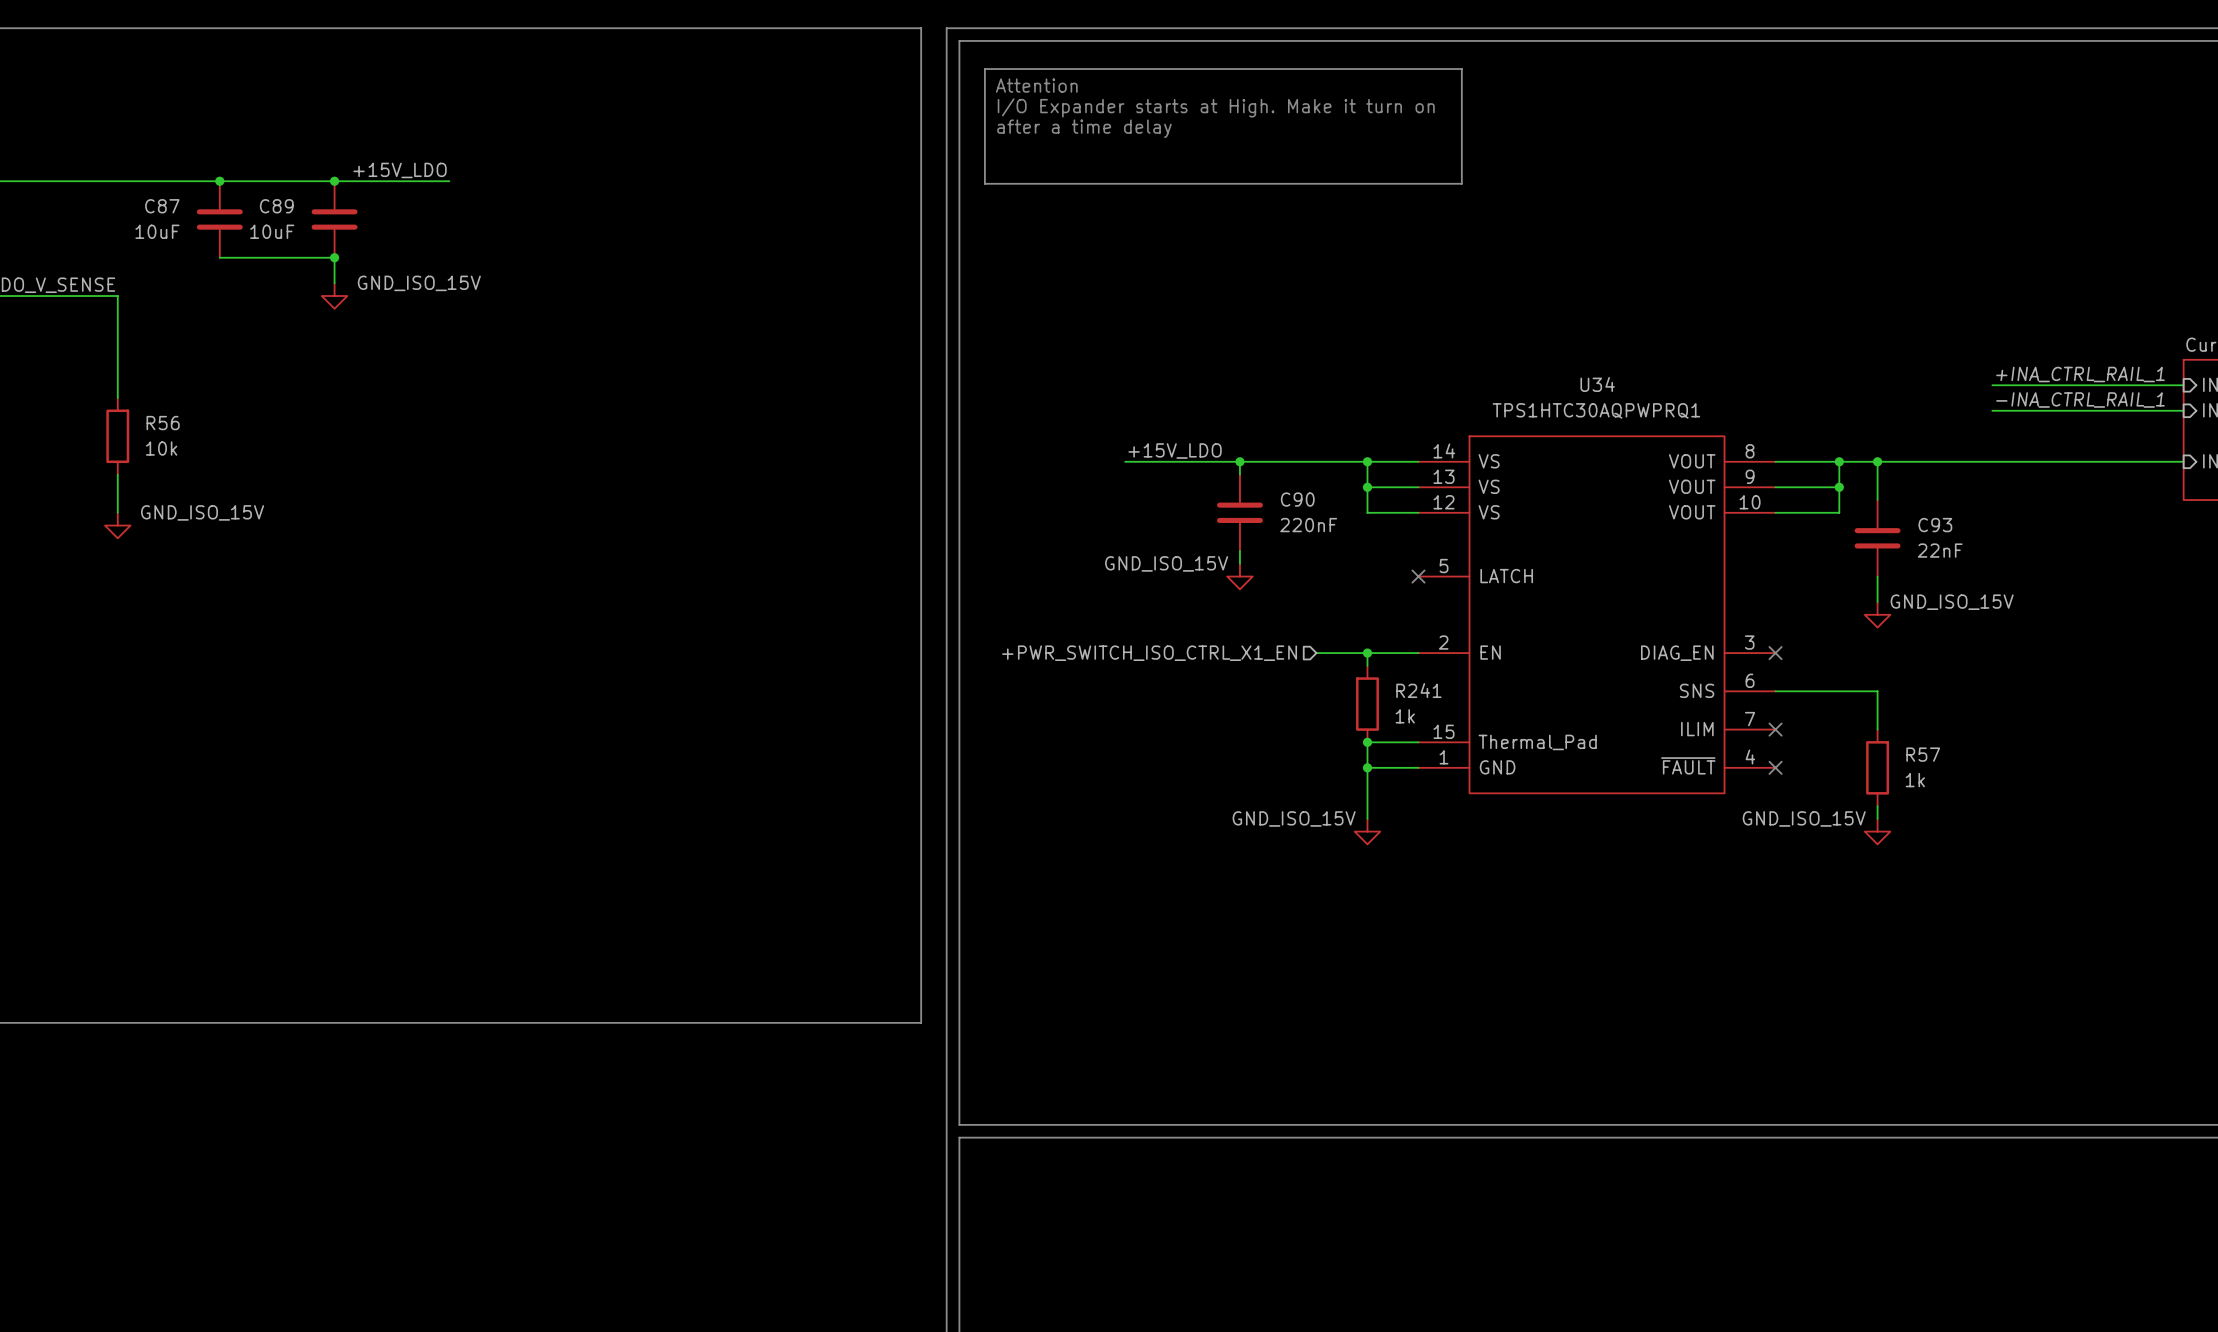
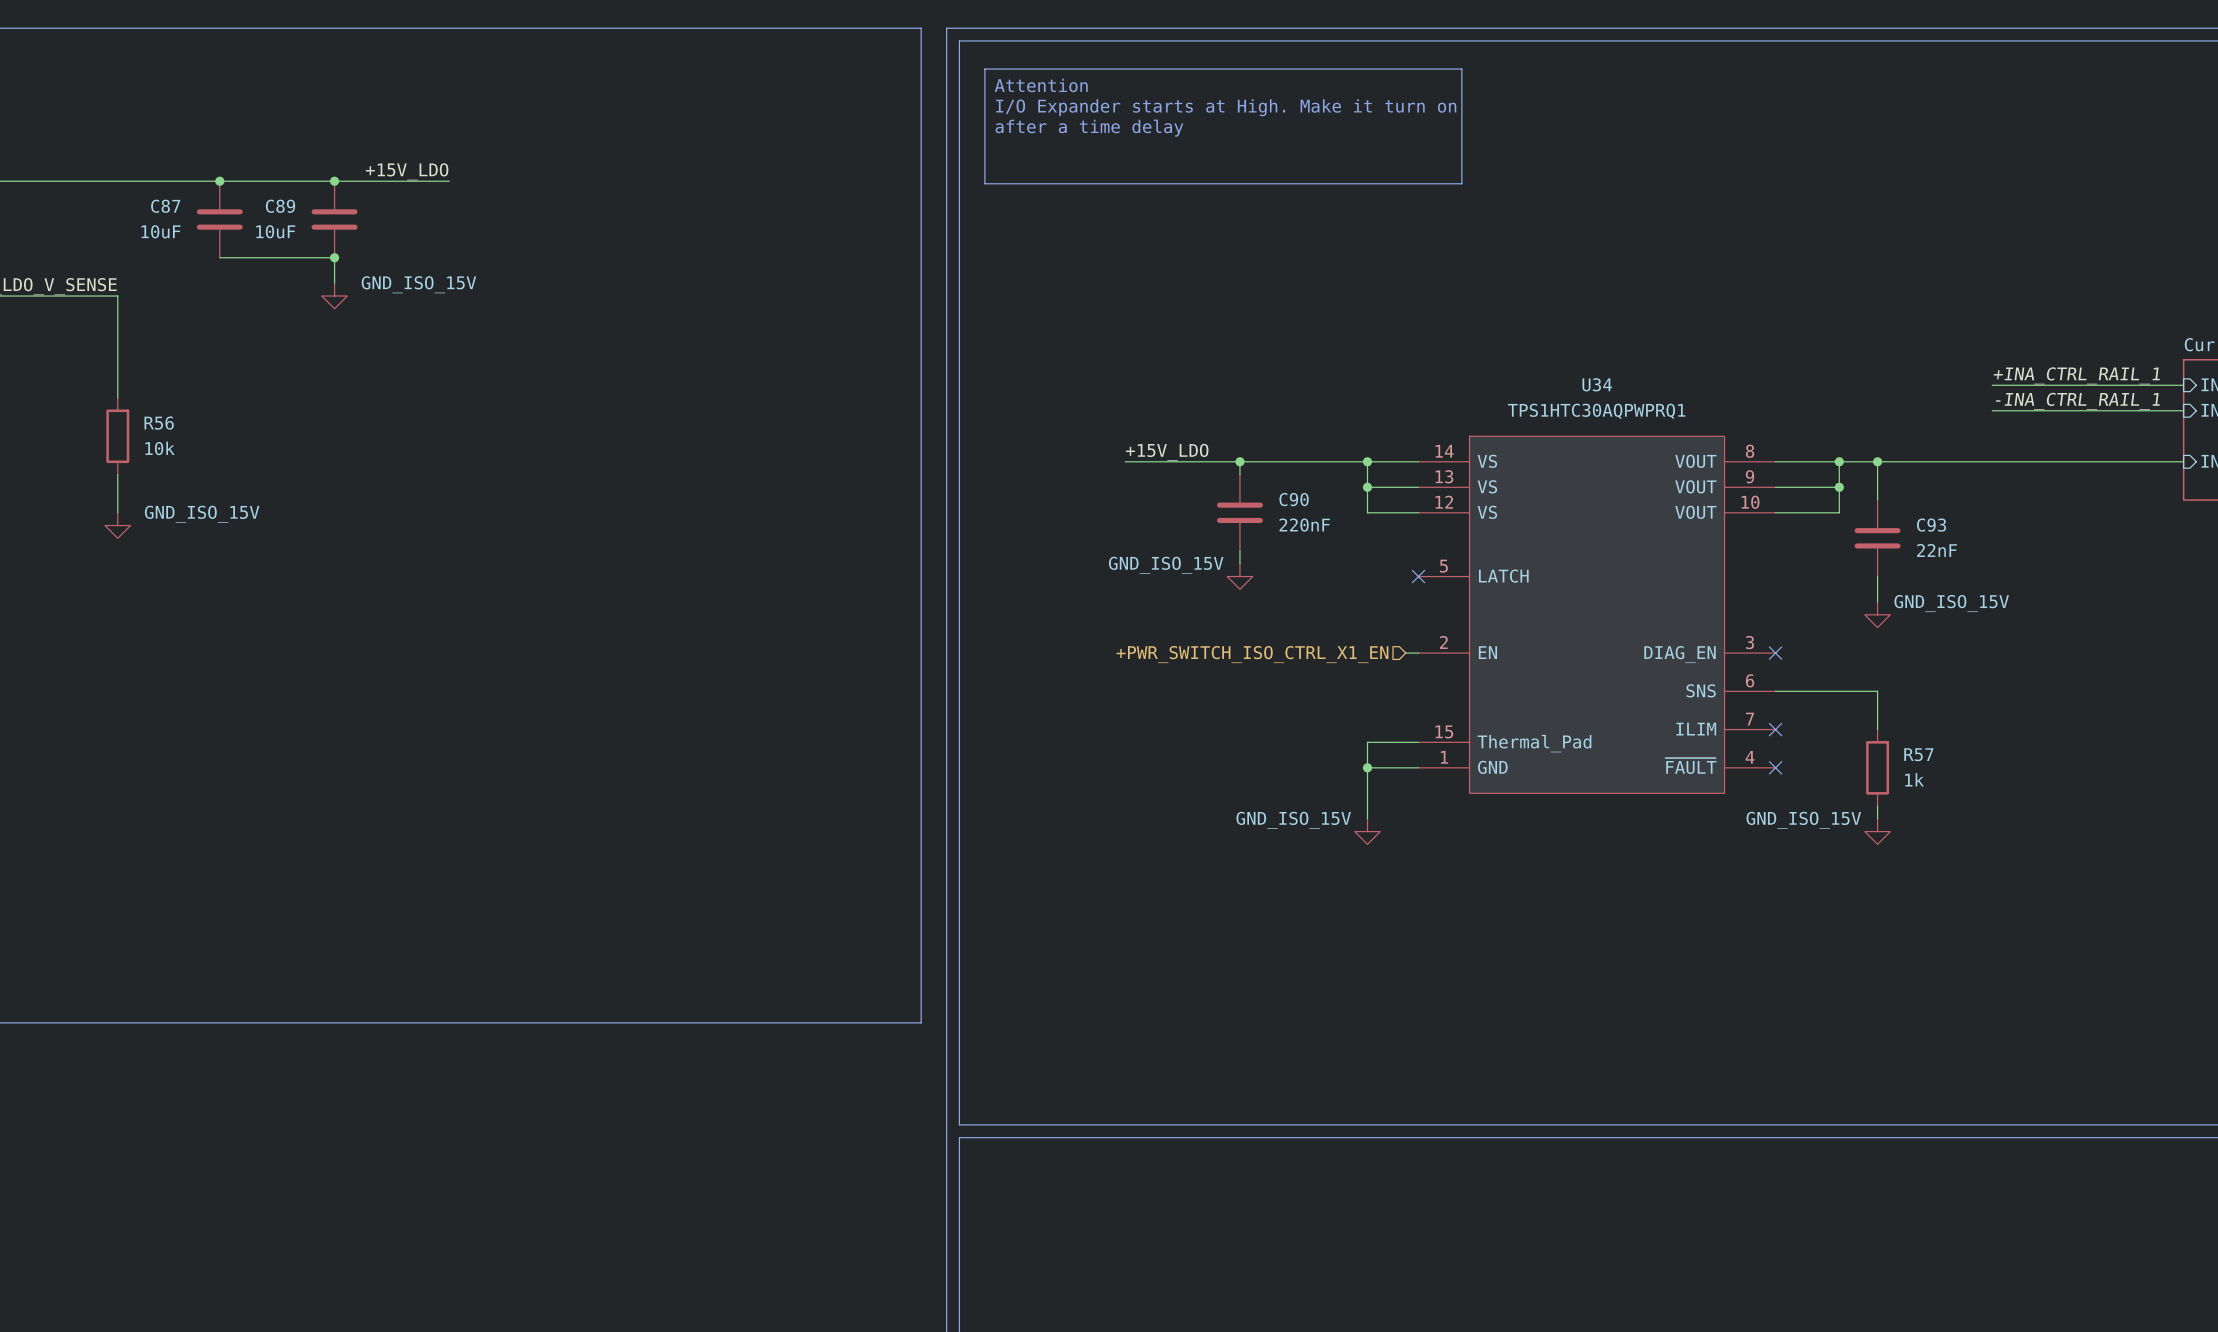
hierarchical label position: +PWR_SWITCH_ISO_CTRL_X1_EN (1149, 653) -> +PWR_SWITCH_ISO_CTRL_X1_EN (1252, 654)
wire: (1316, 653) (1405, 653) -> none
wire: (1367, 653) (1367, 665) -> none
junction: (1367, 653) -> none
R241: (1367, 704) -> none
junction: (1367, 742) -> none

